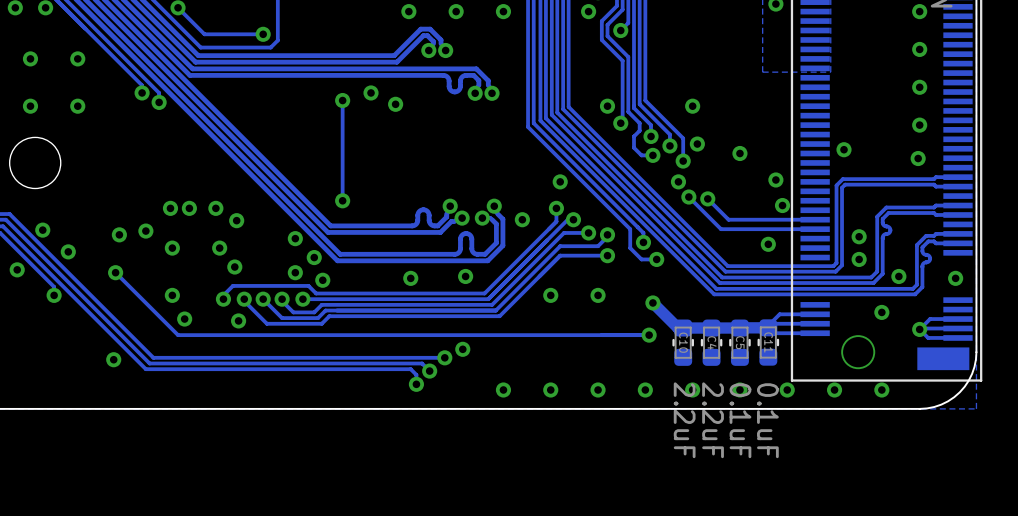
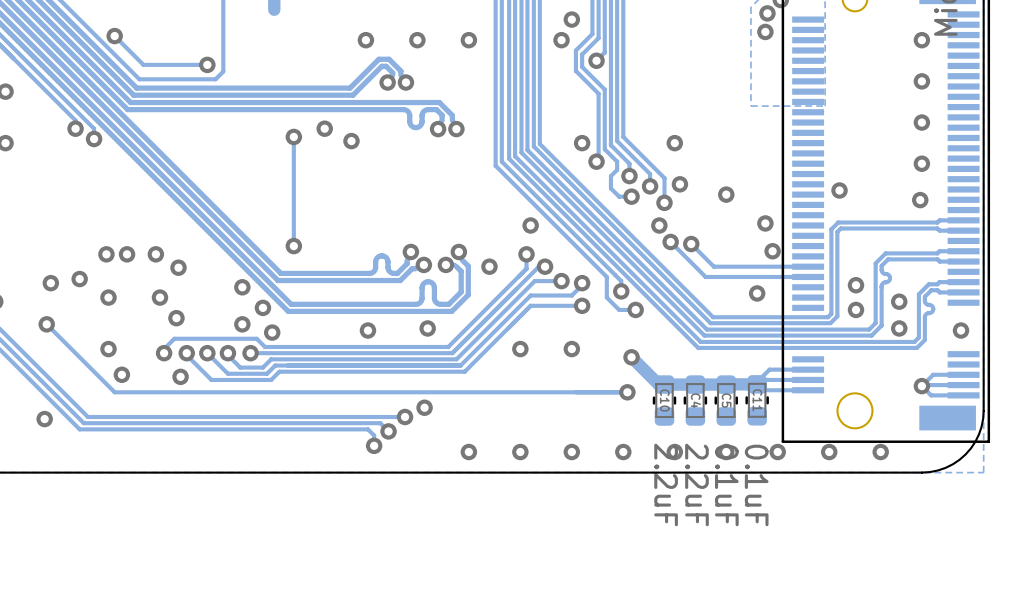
via position: (881, 312) -> (899, 301)

